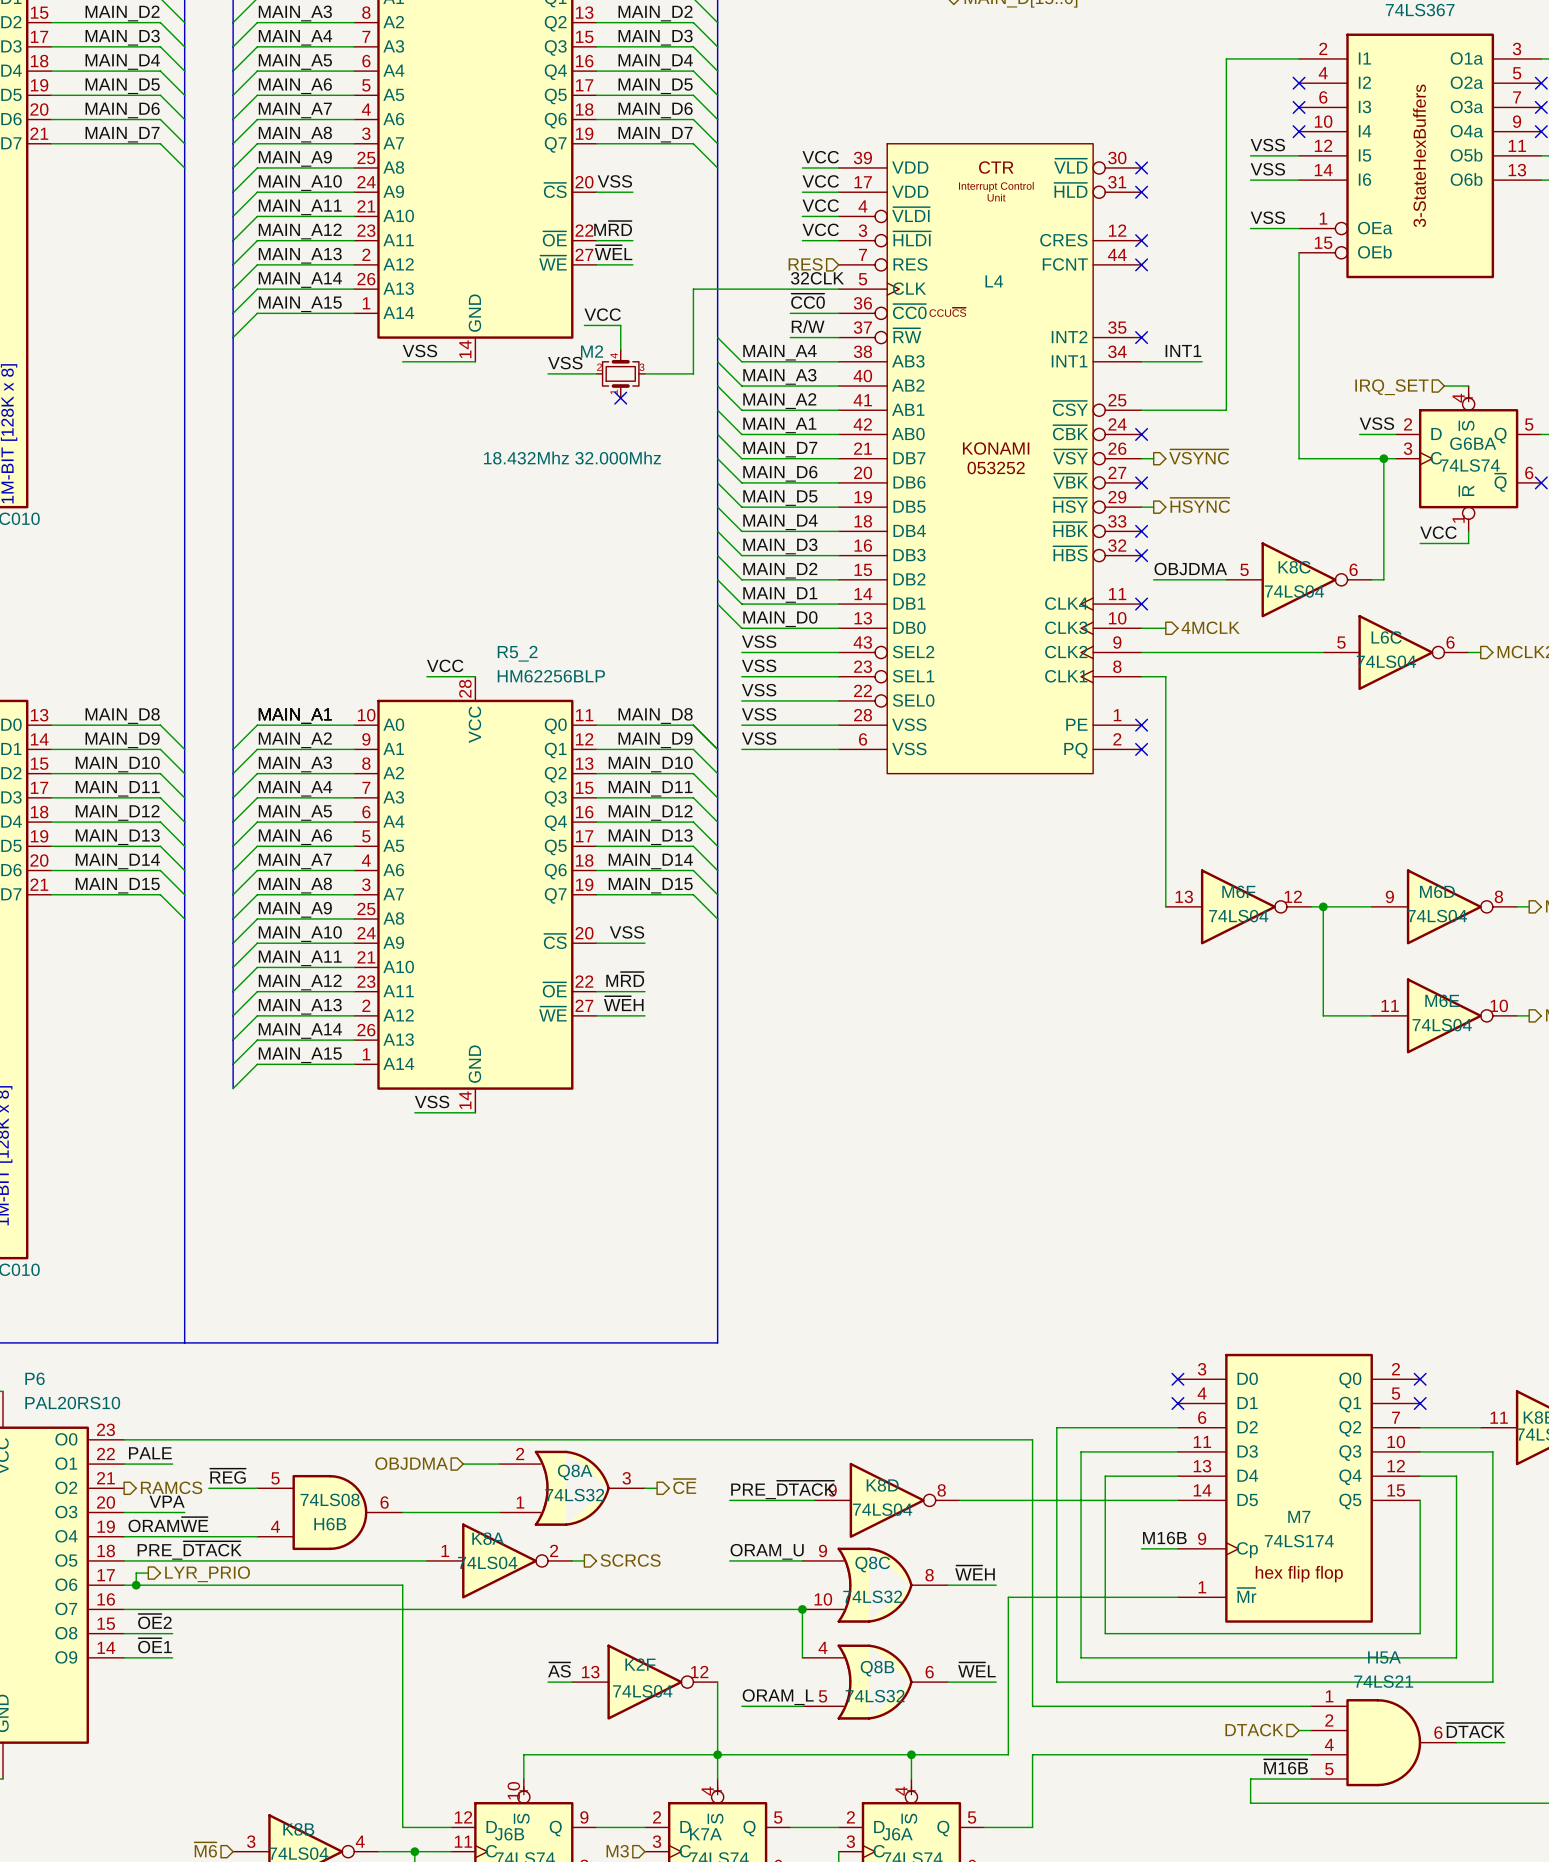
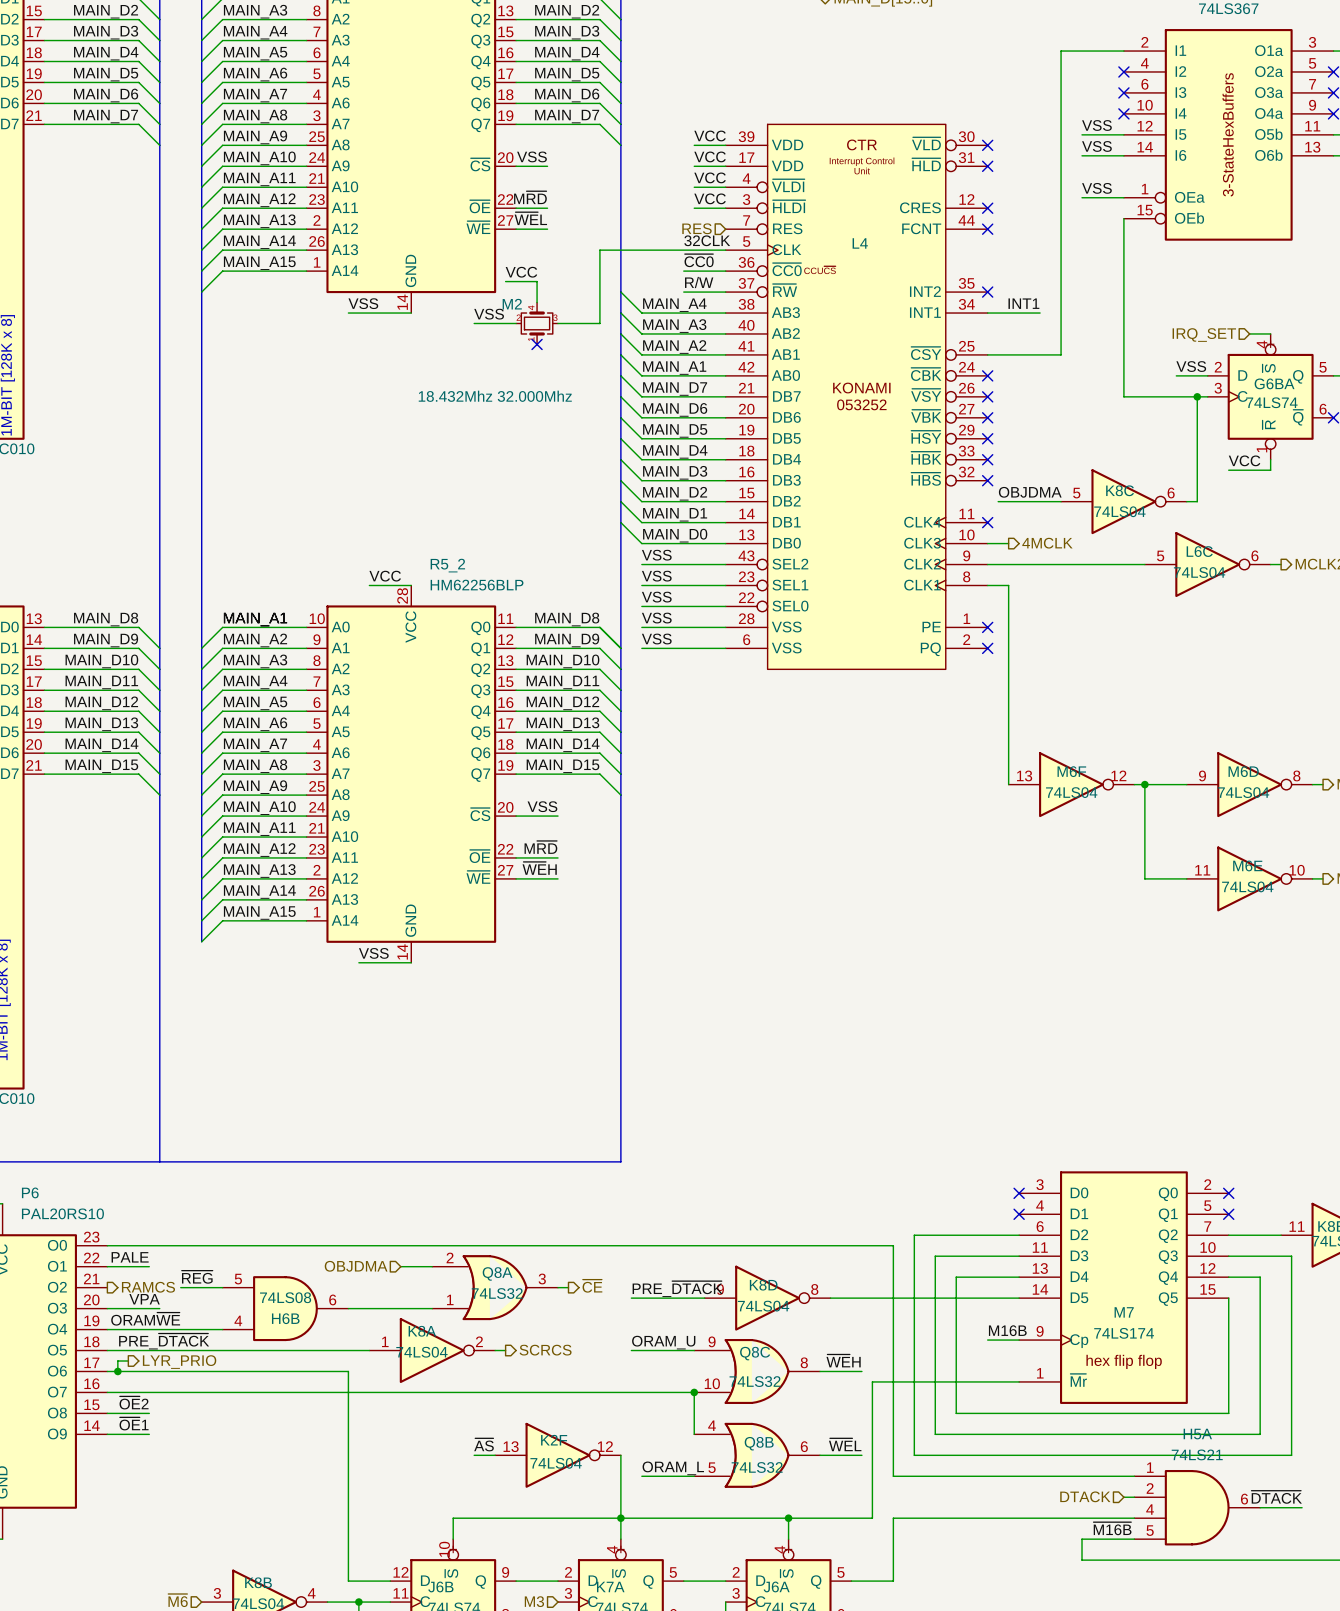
hierarchical label: ~{VSYNC} (1199, 456) -> none
wire: (1141, 458) (1153, 458) -> none
no-connect mark: none -> (987, 396)
hierarchical label: ~{HSYNC} (1200, 505) -> none
wire: (1141, 507) (1153, 507) -> none
no-connect mark: none -> (987, 438)

